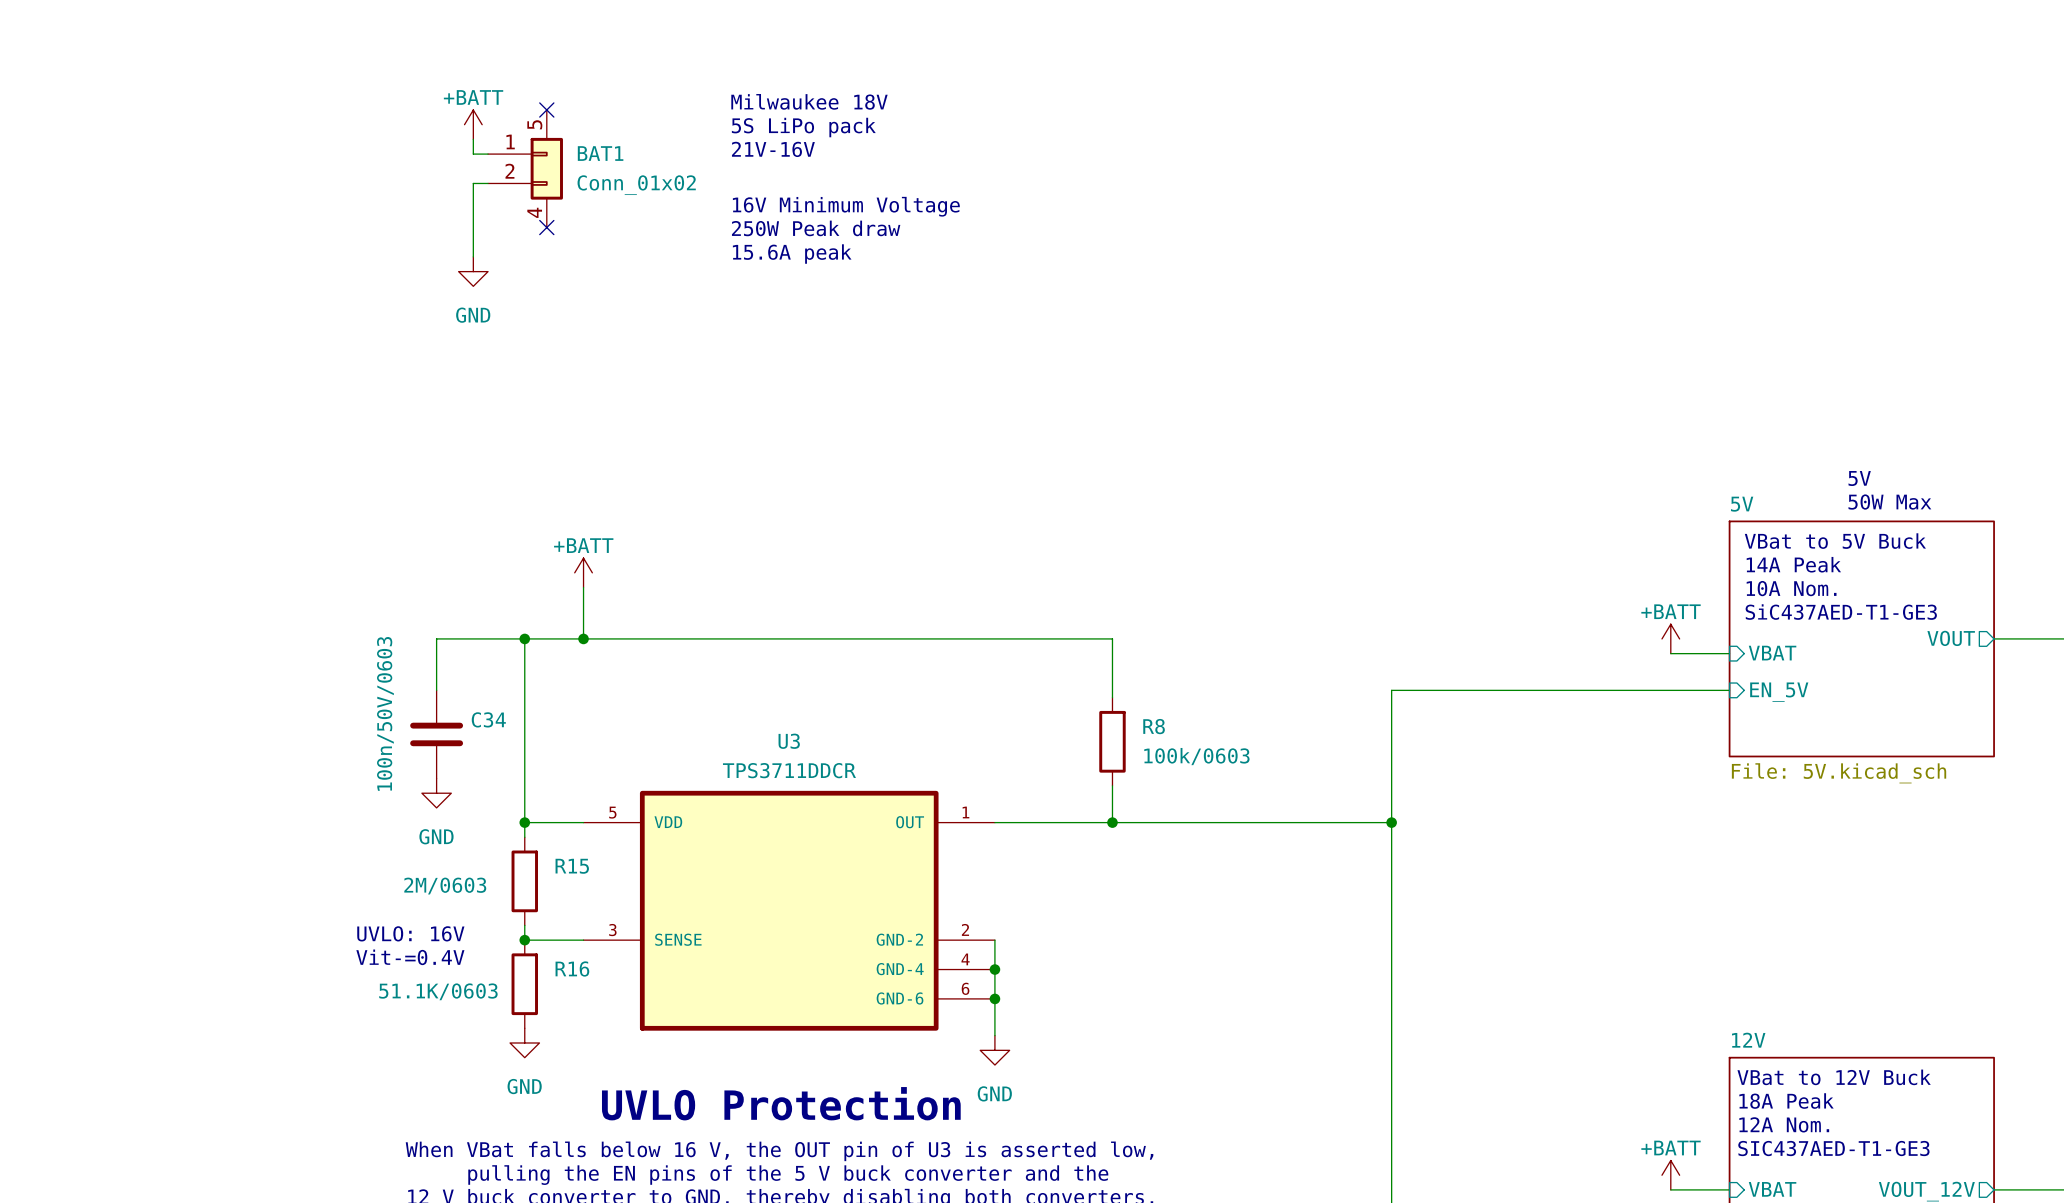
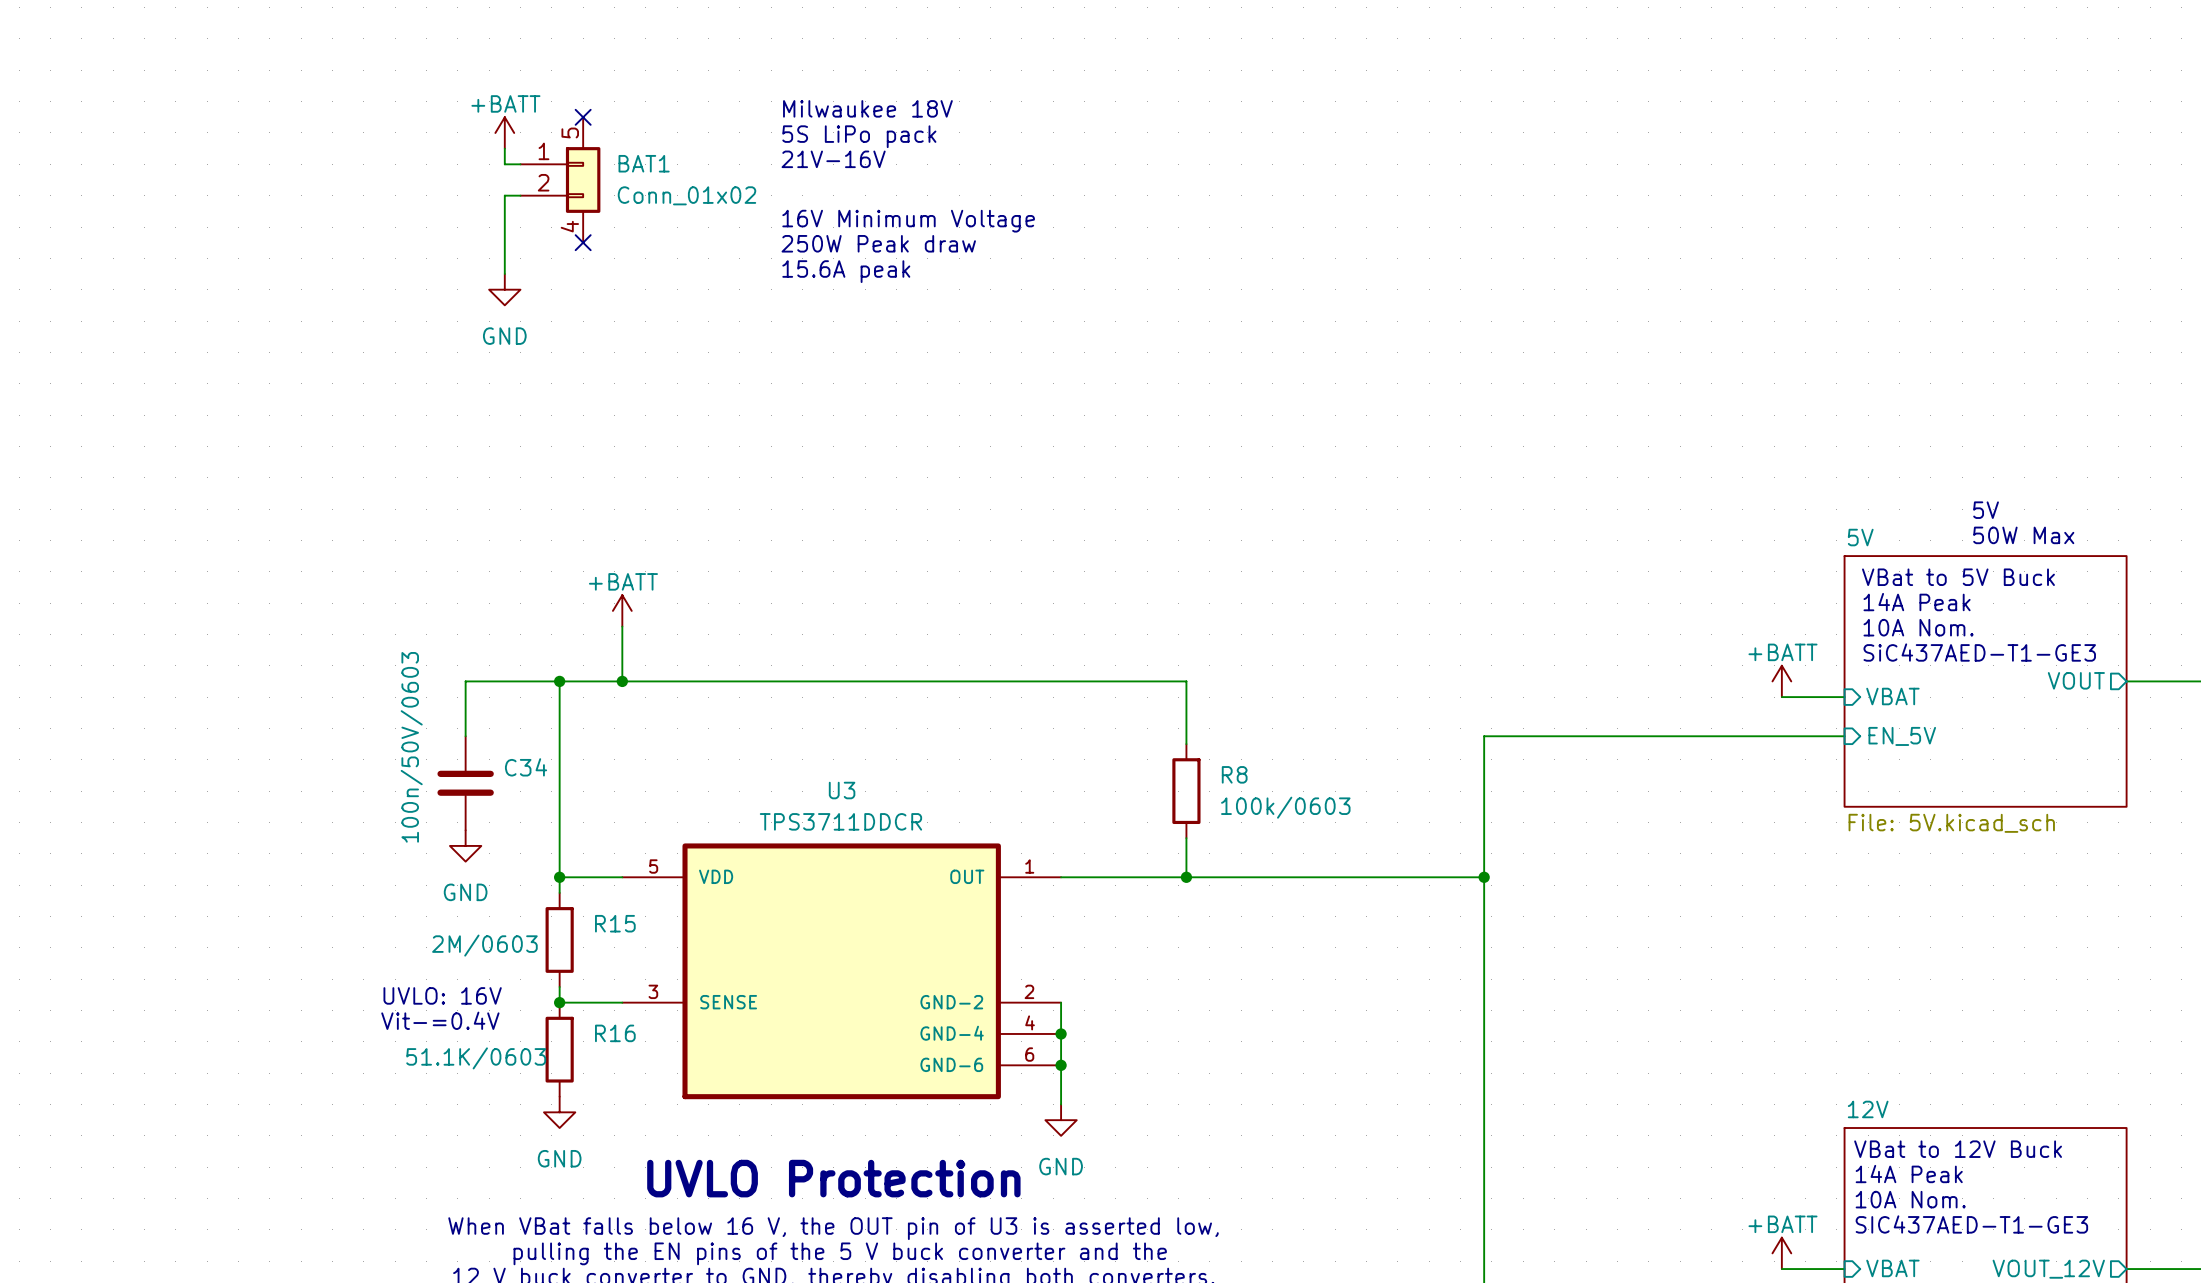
text: 18A Peak (1786, 1101) -> 14A Peak (1909, 1174)
text: 12A Nom. (1784, 1124) -> 10A Nom. (1910, 1199)

